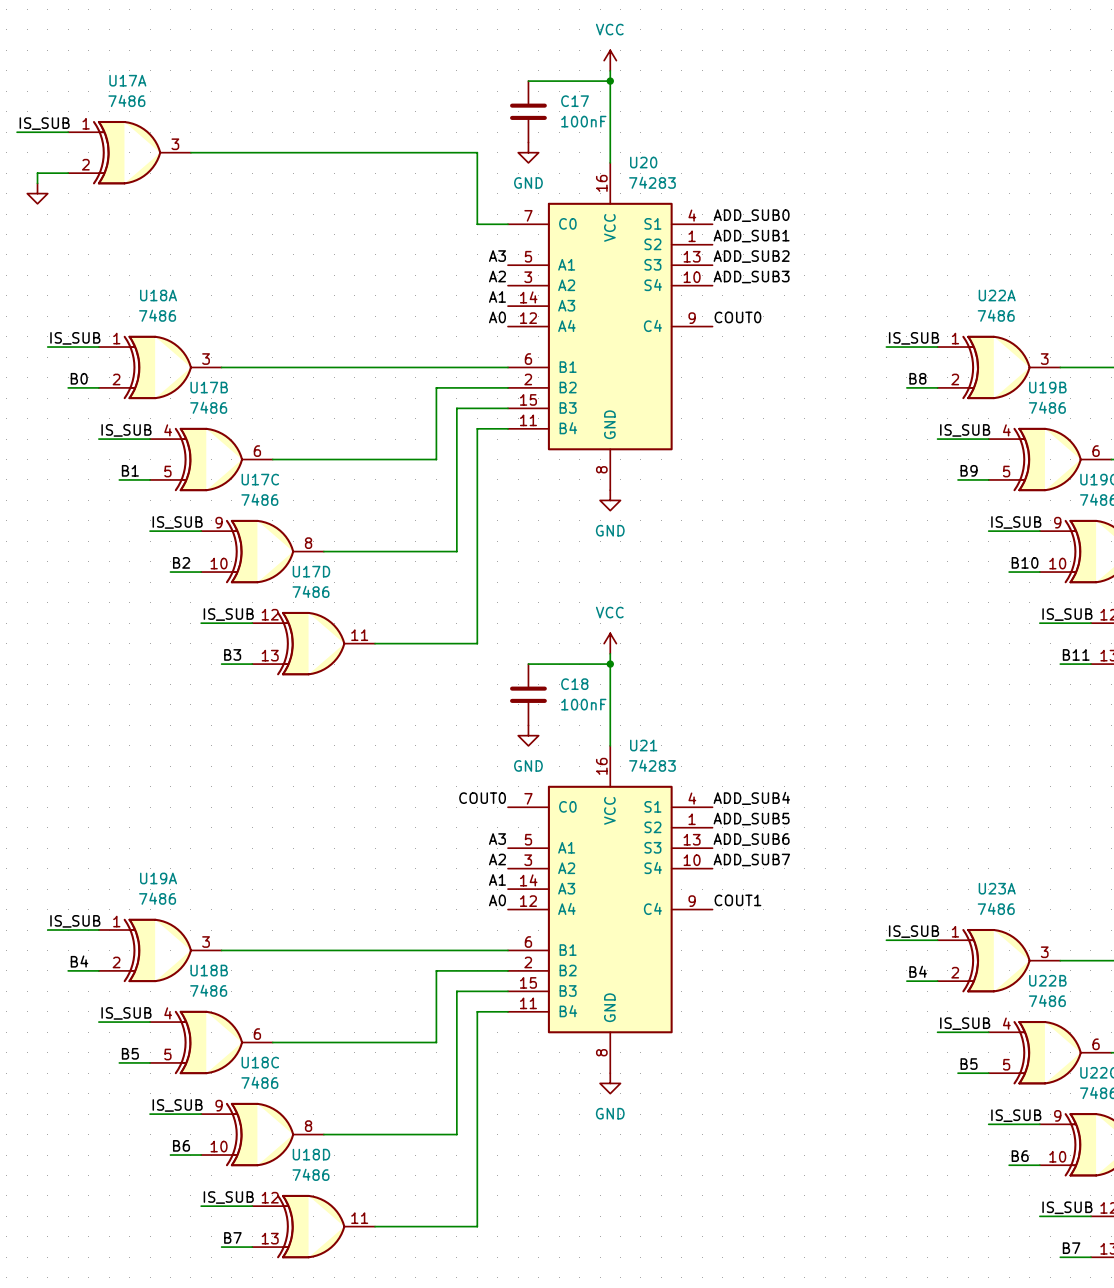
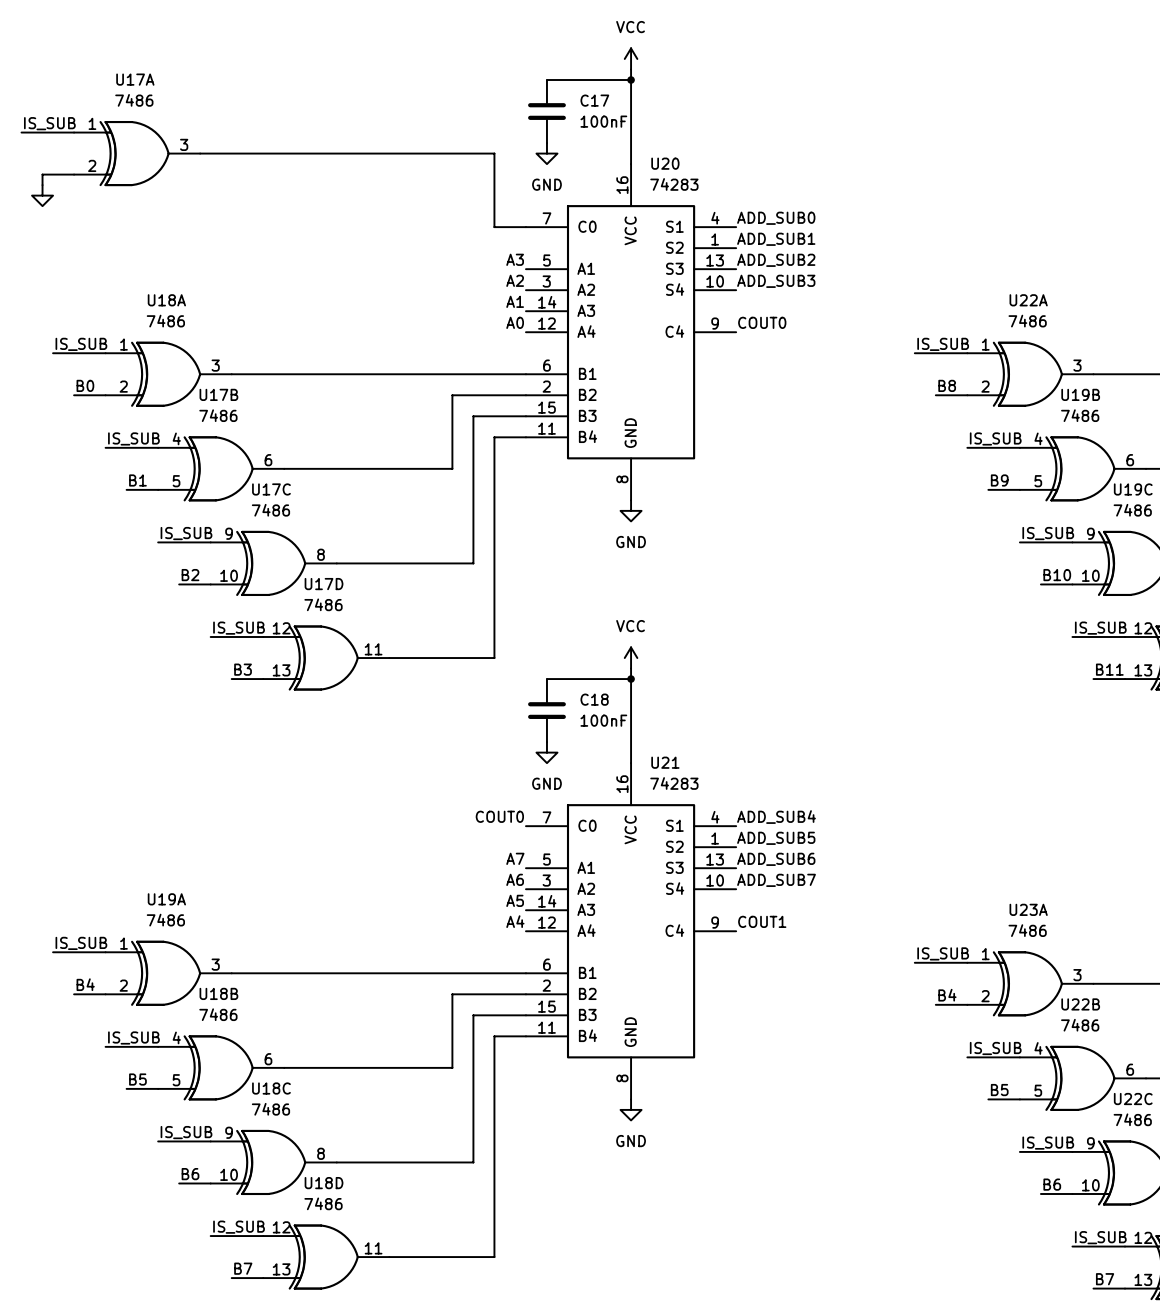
label: A3 (497, 839) -> A7 (515, 858)
label: A2 (497, 859) -> A6 (515, 879)
label: A1 (497, 879) -> A5 (515, 900)
label: A0 (497, 900) -> A4 (515, 921)

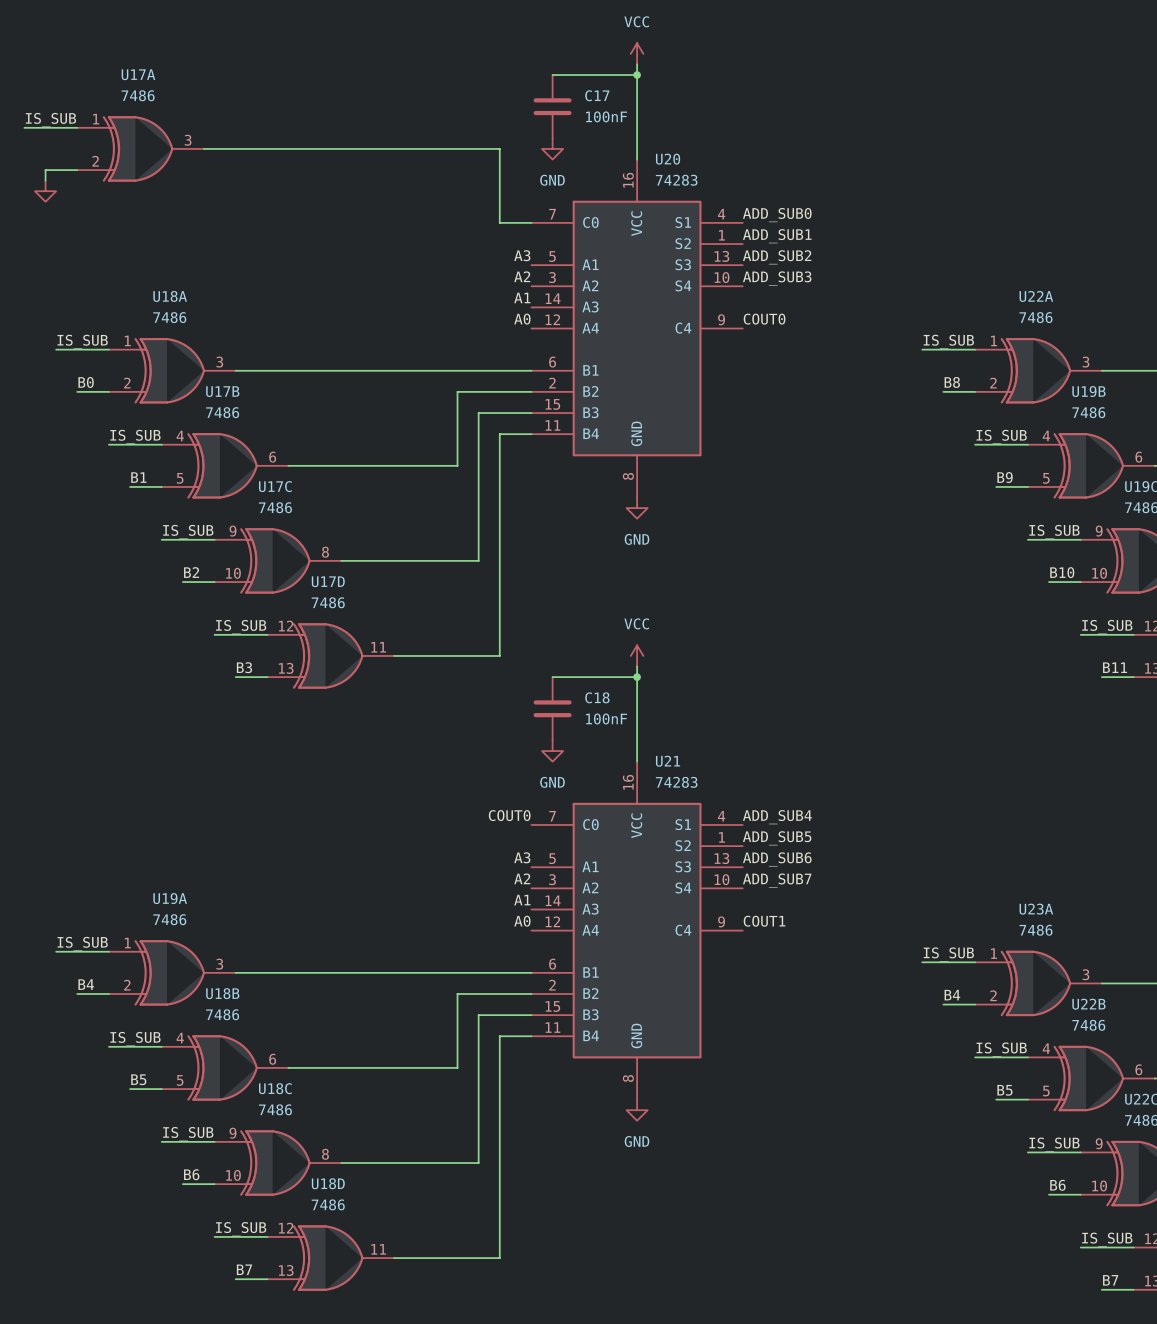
label: A7 (515, 858) -> A3 (522, 857)
label: A6 (515, 879) -> A2 (522, 878)
label: A5 (515, 900) -> A1 (522, 900)
label: A4 (515, 921) -> A0 (522, 921)

